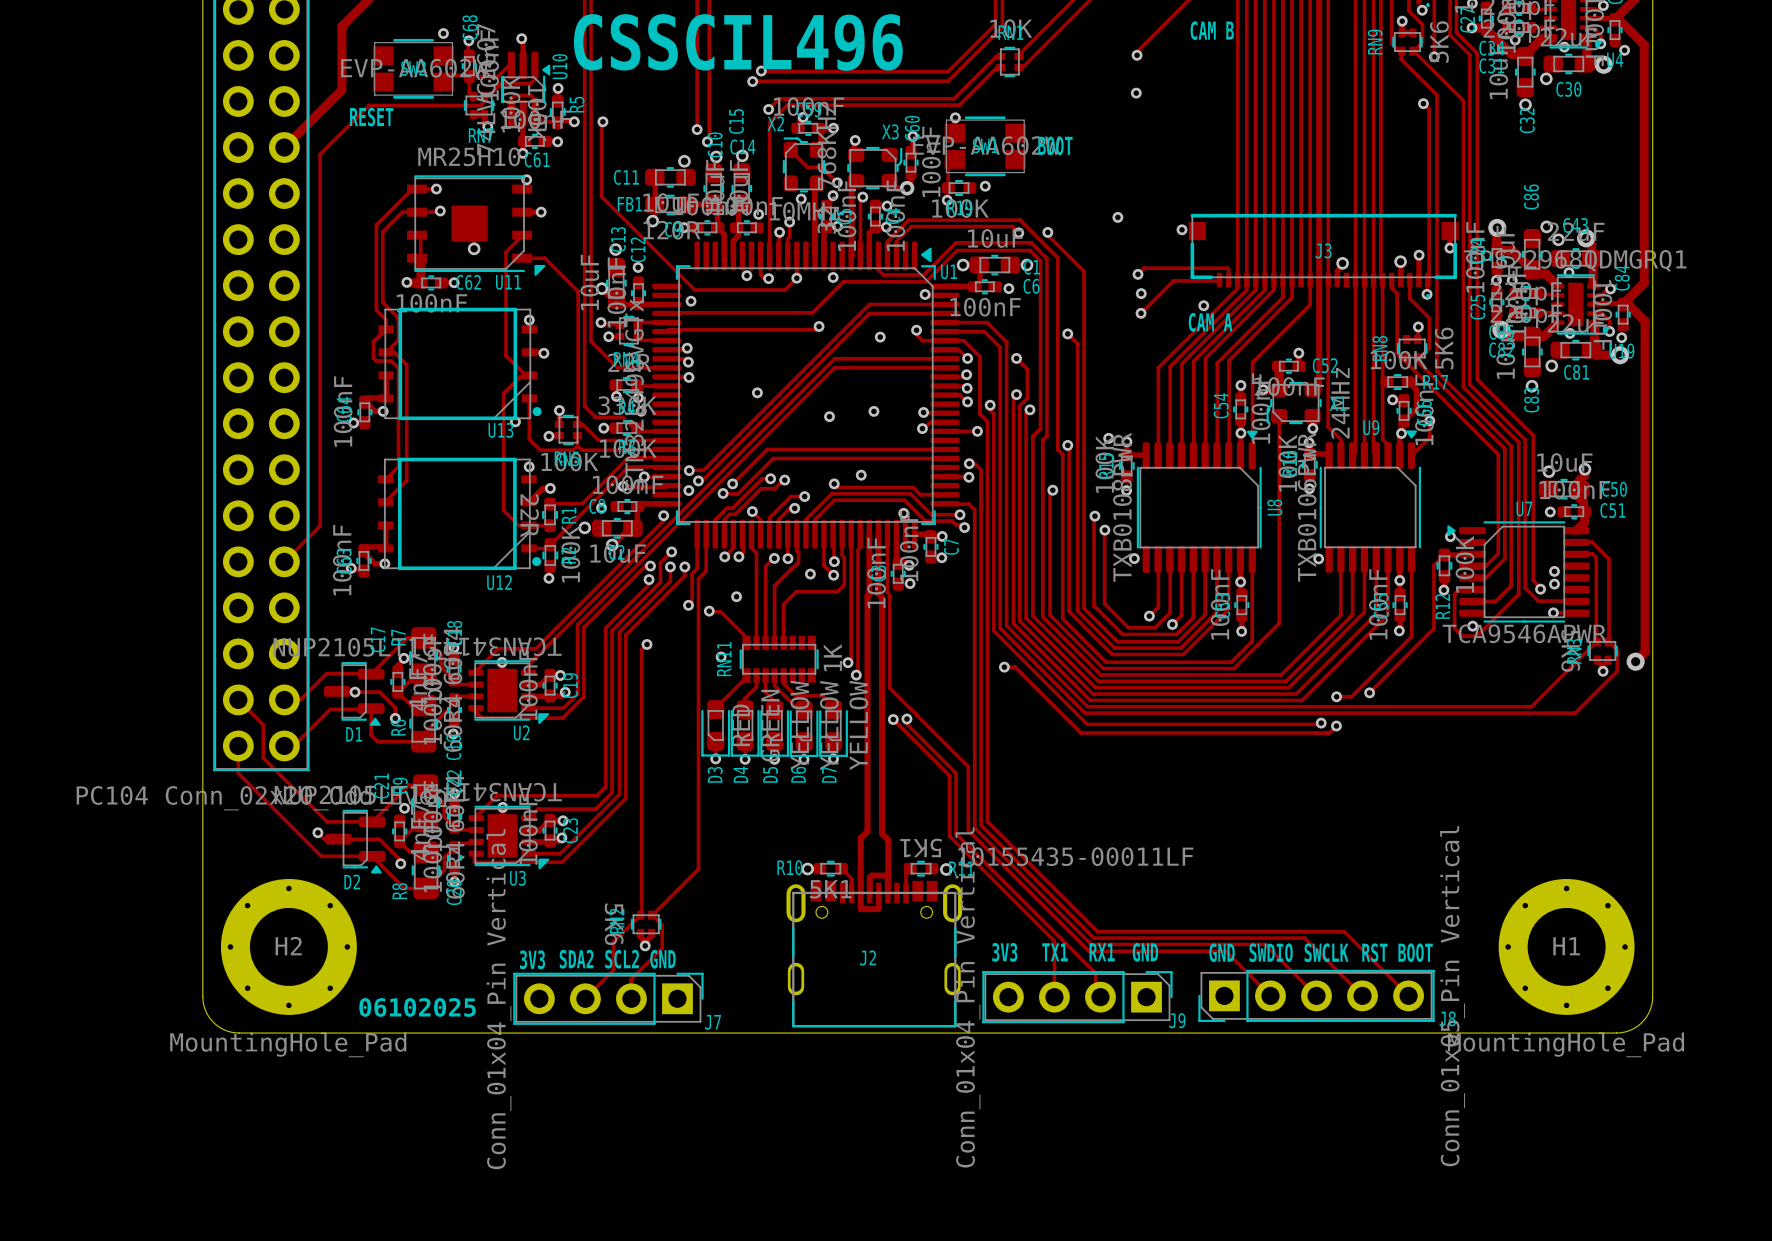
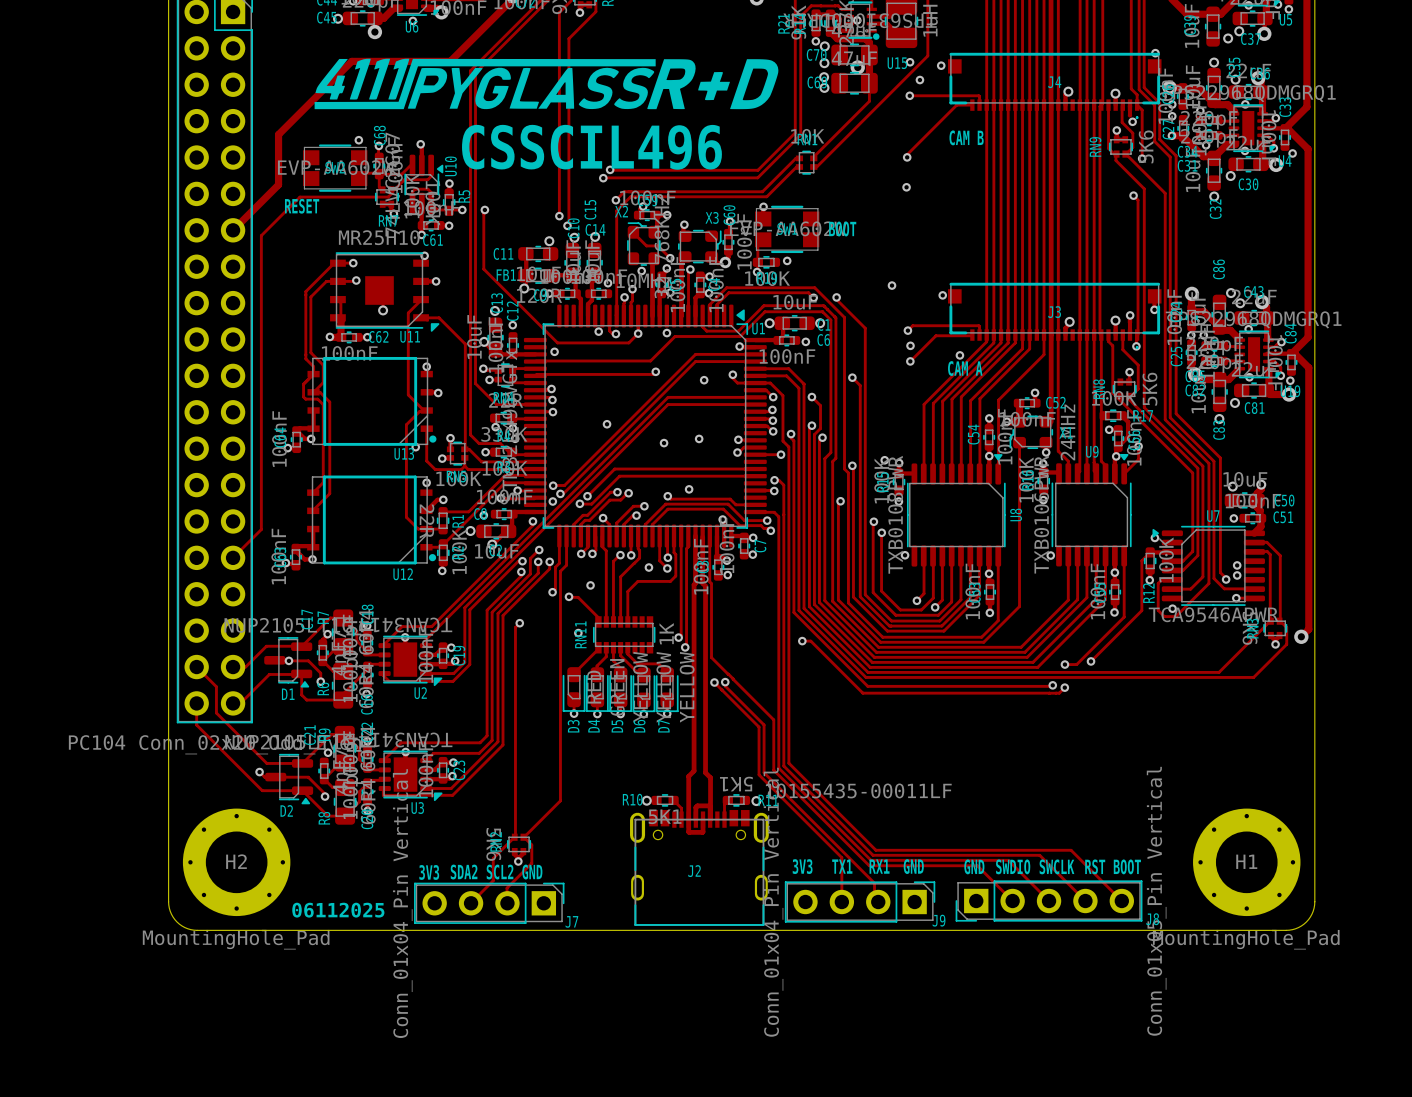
text: 06102025 (417, 1007) -> 06112025 (338, 910)

